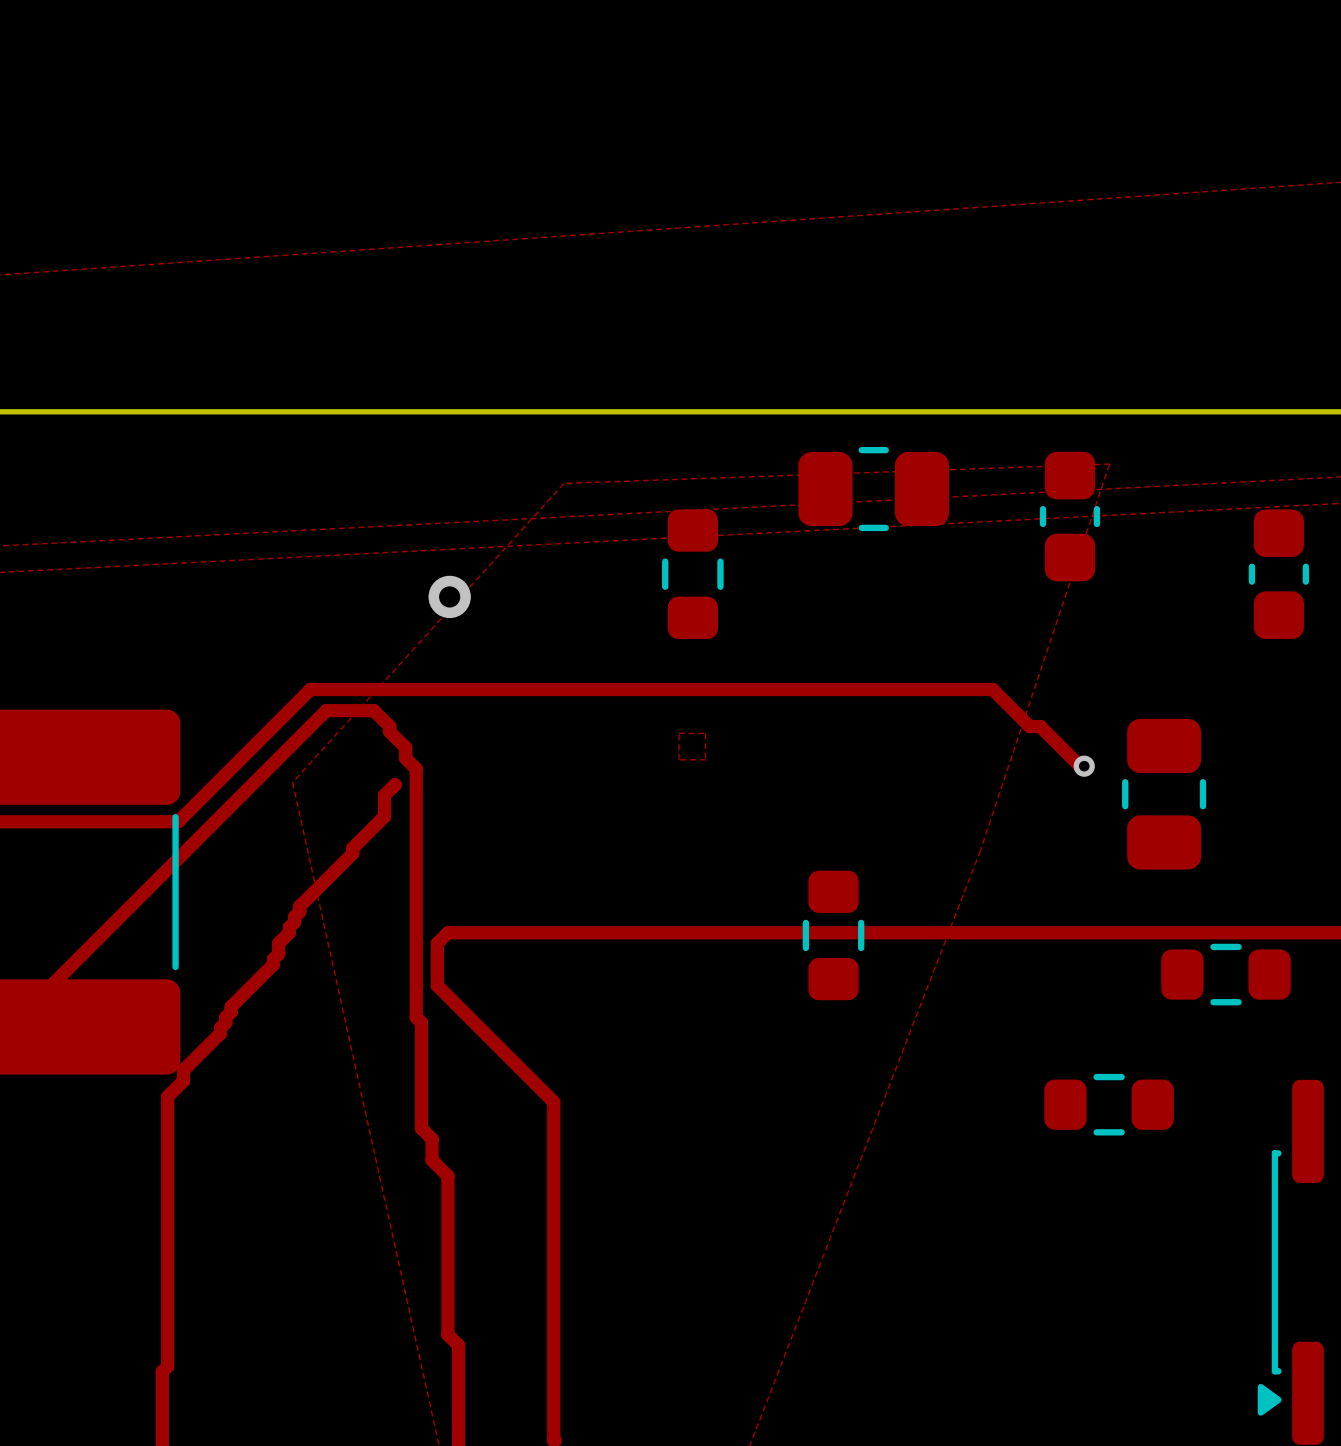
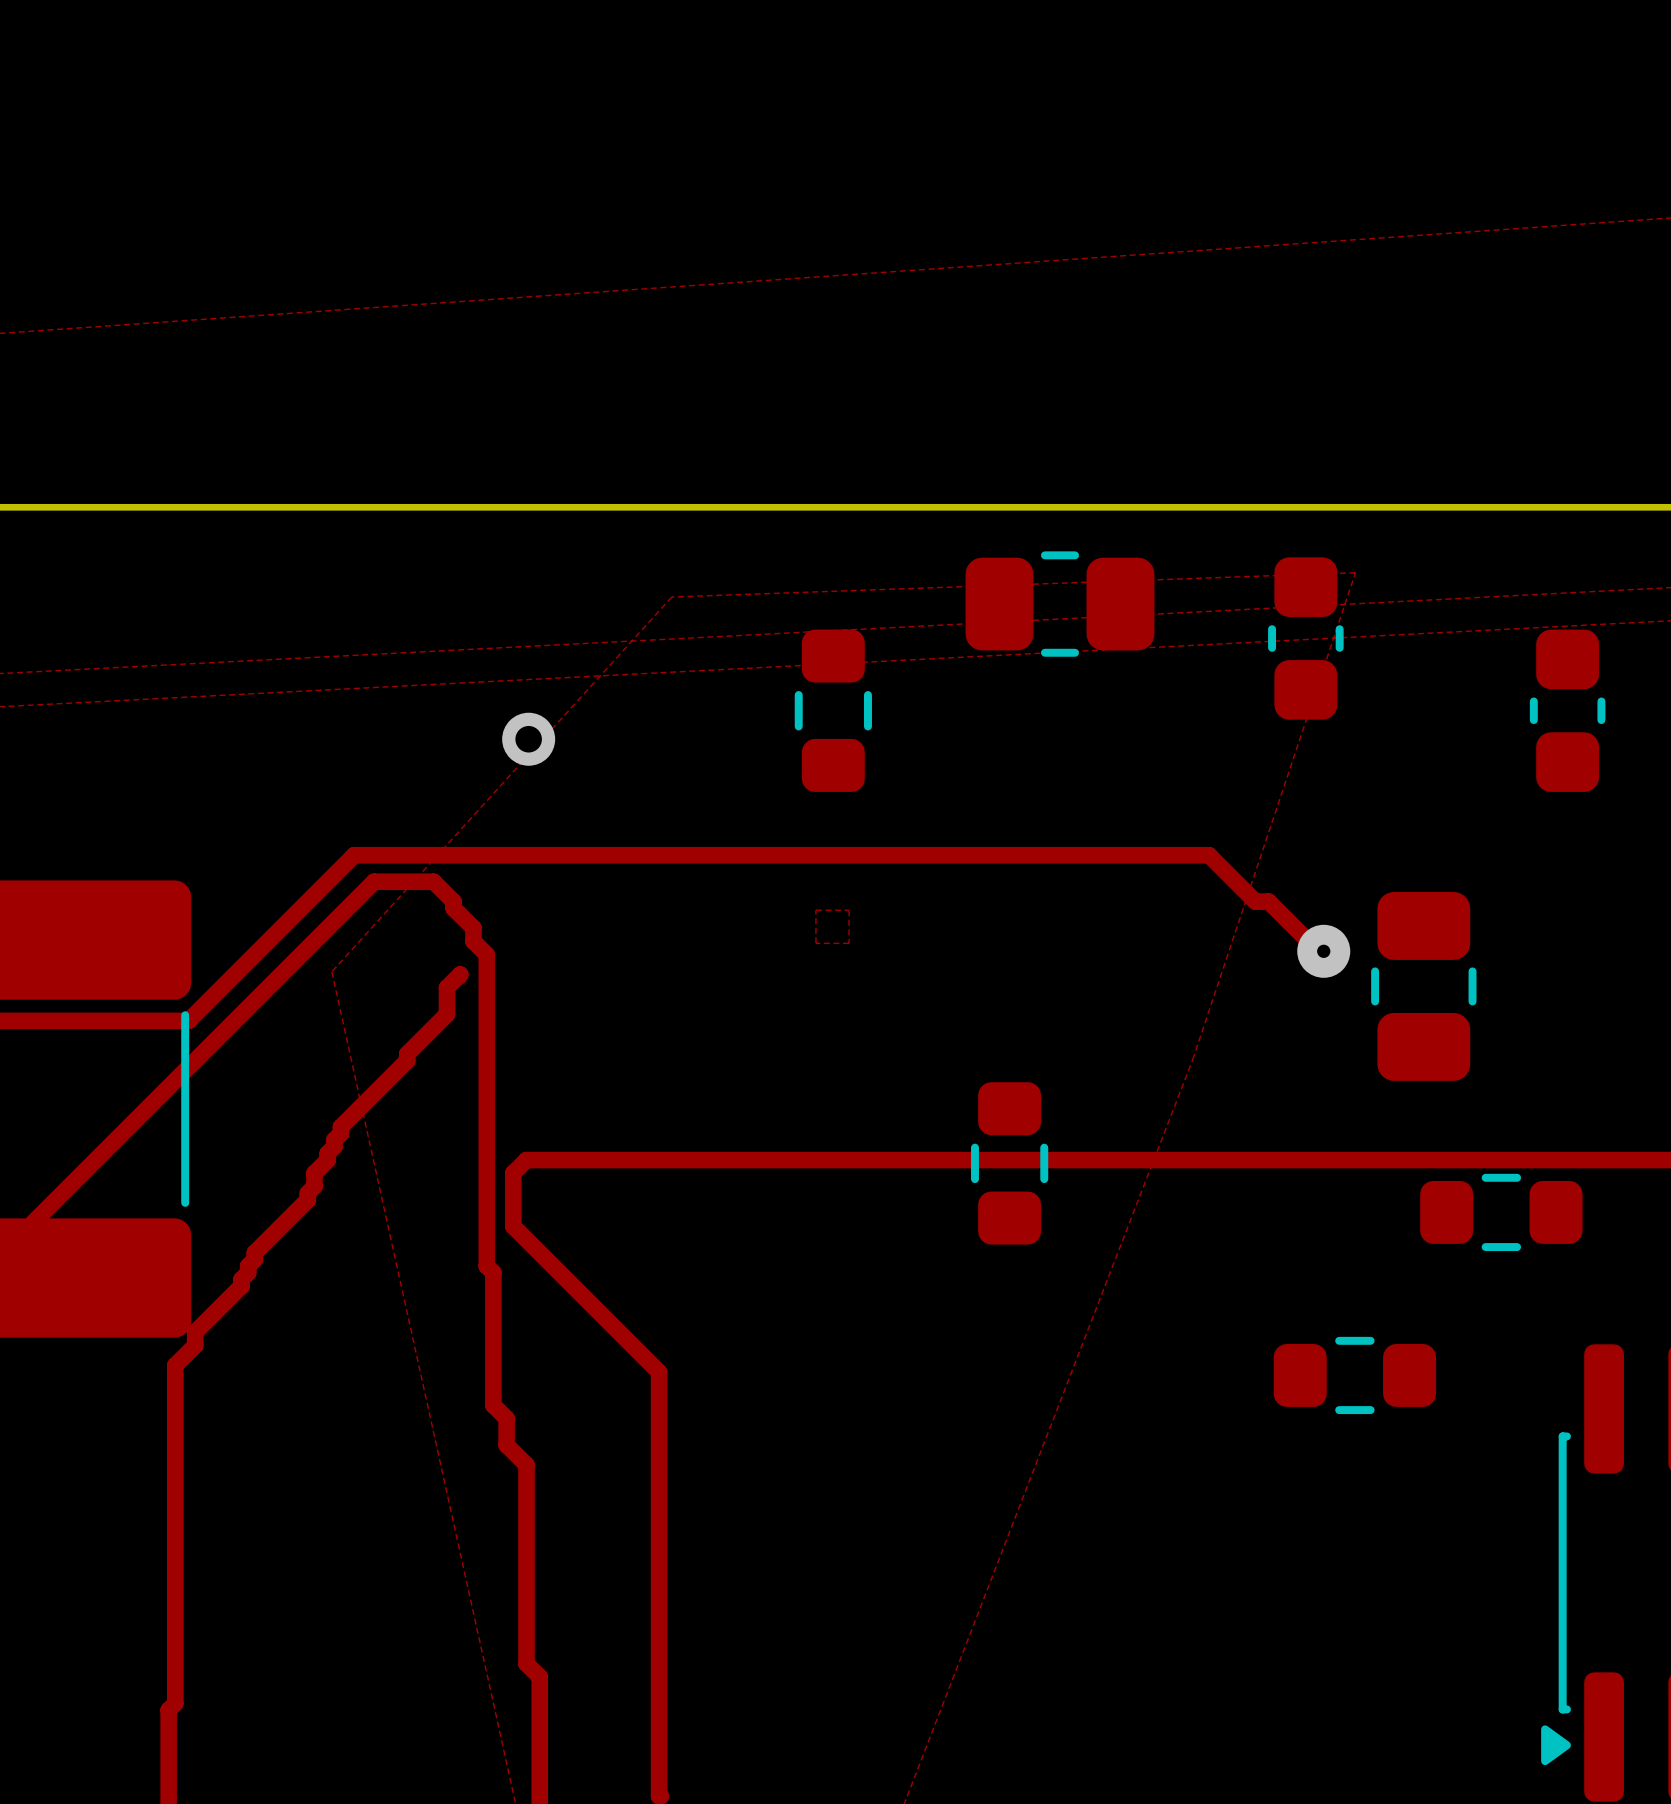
via size: [1073, 755, 1095, 777] -> [1297, 924, 1351, 978]

